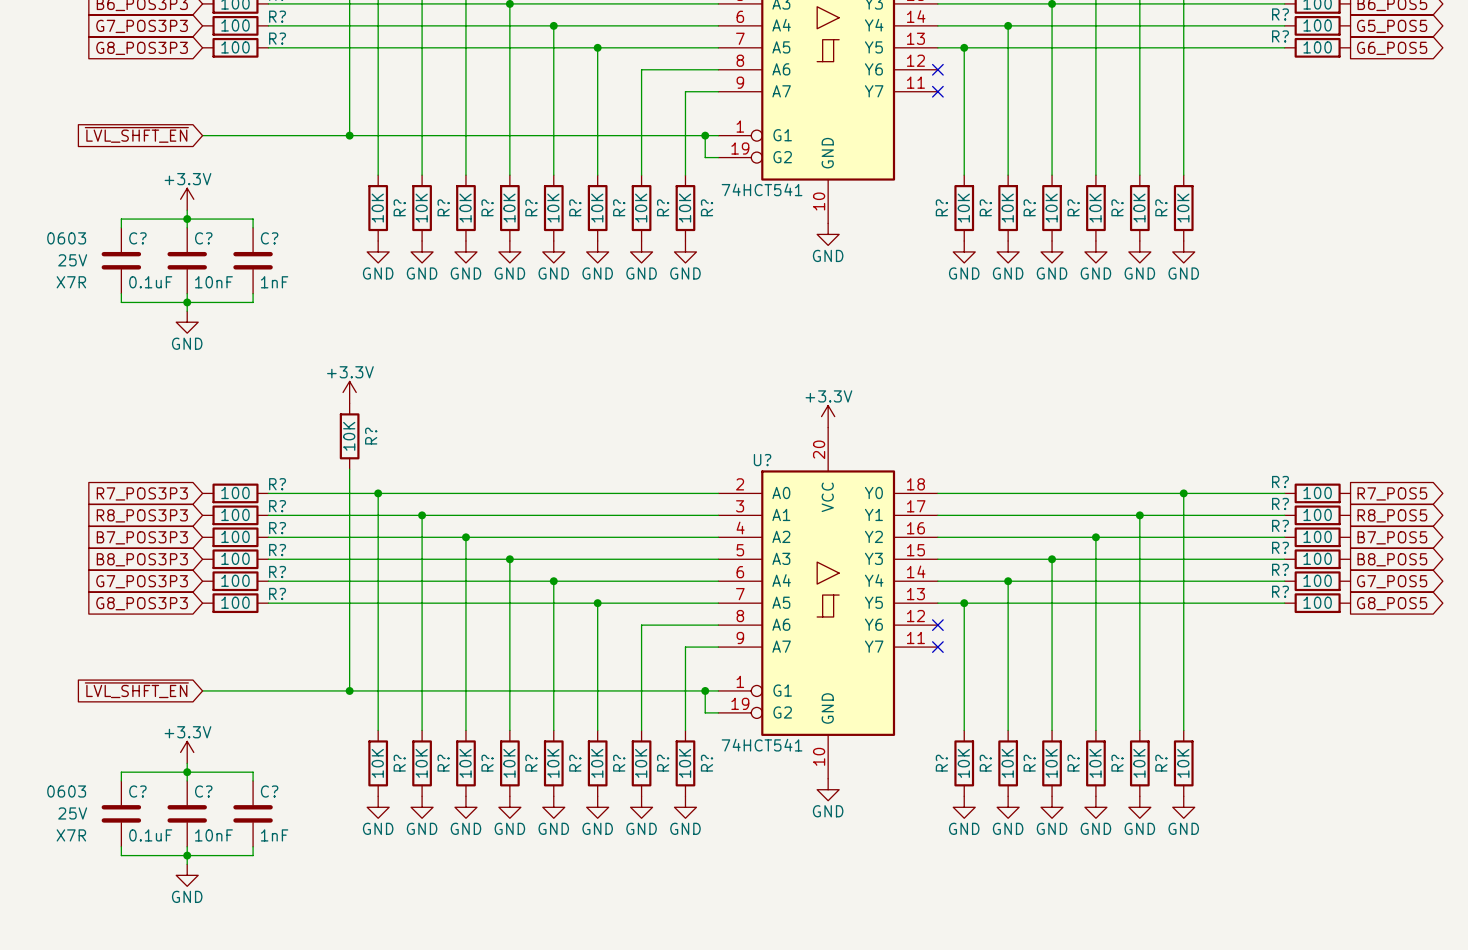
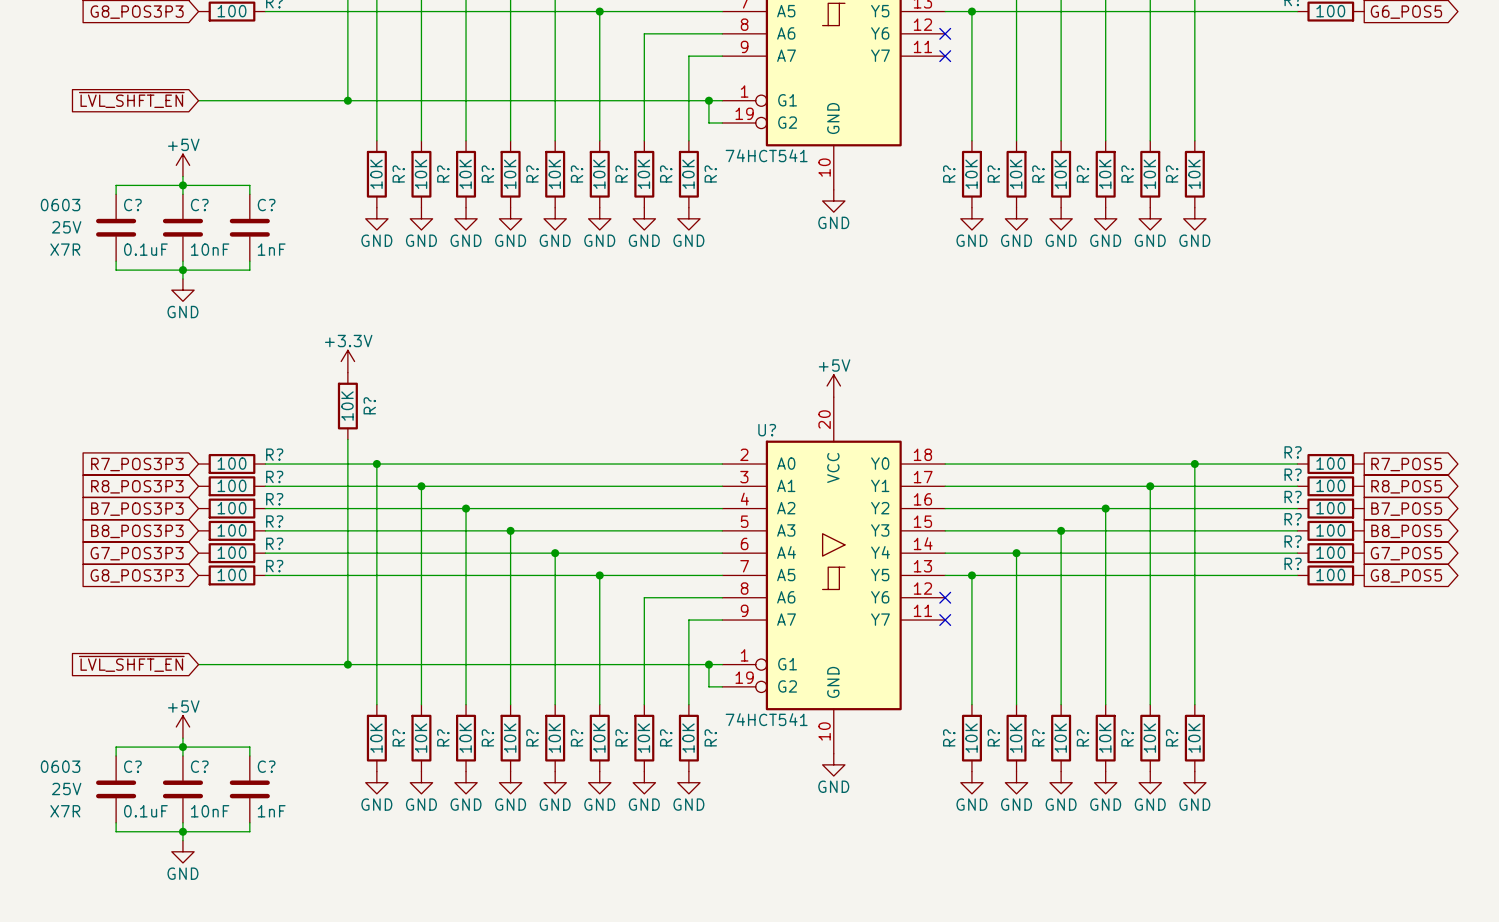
power symbol: +3.3V (187, 199) -> +5V (182, 165)
power symbol: +3.3V (828, 416) -> +5V (833, 385)
power symbol: +3.3V (187, 752) -> +5V (182, 727)

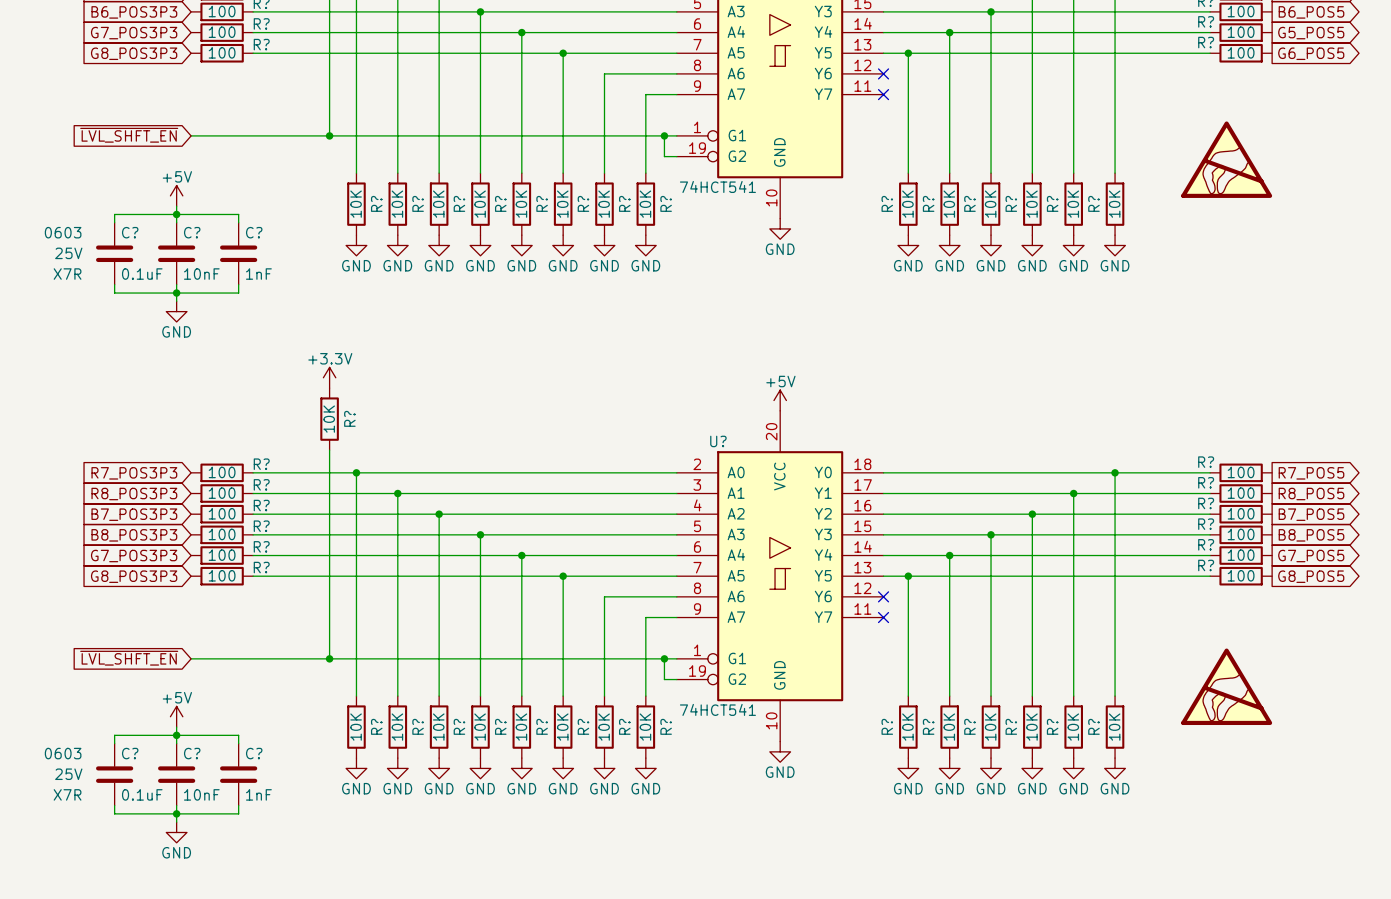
power symbol: none -> (1226, 159)
power symbol: none -> (1226, 686)

